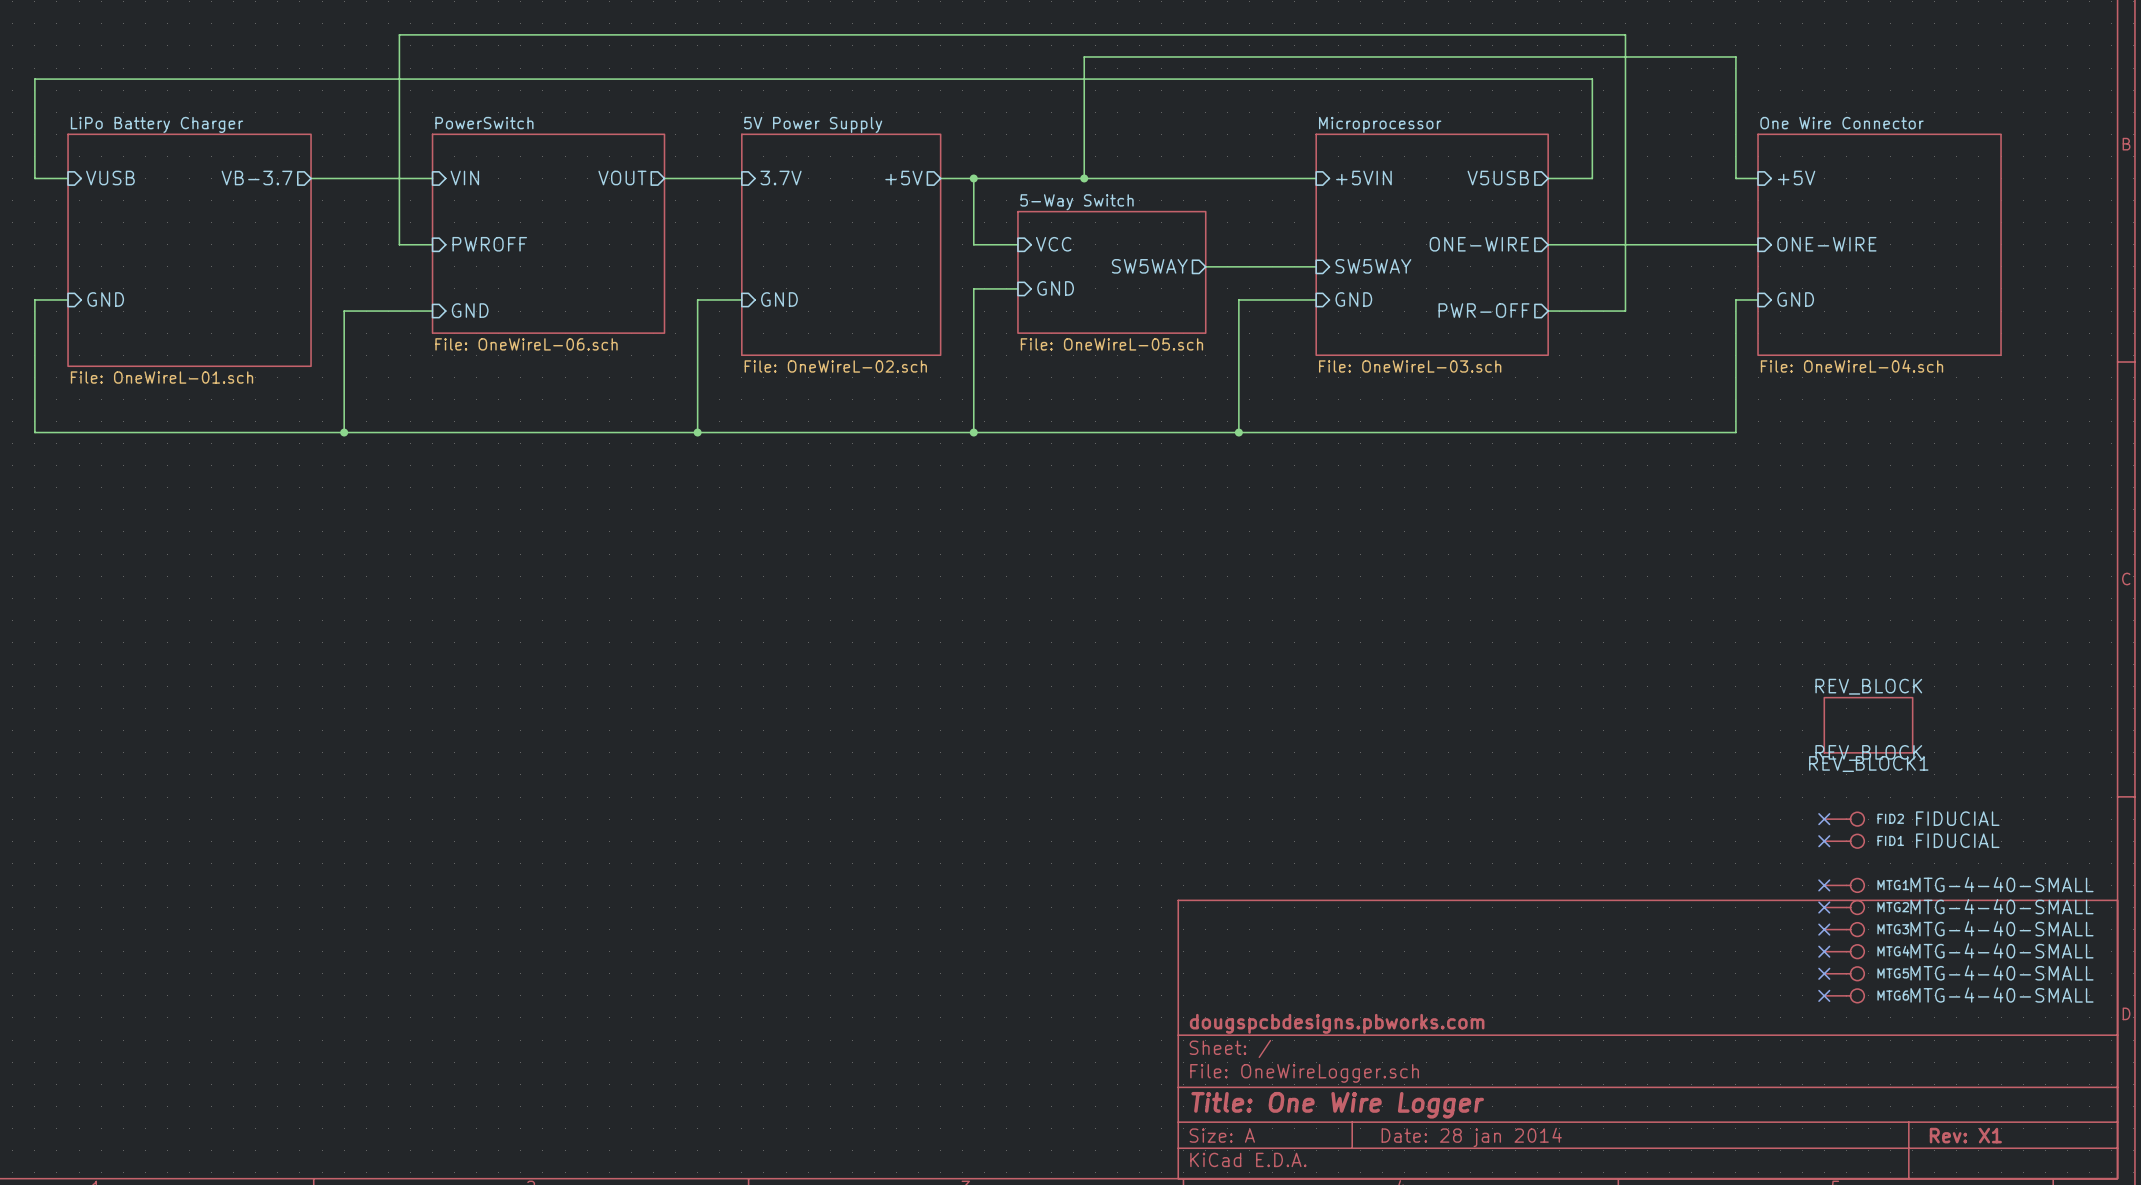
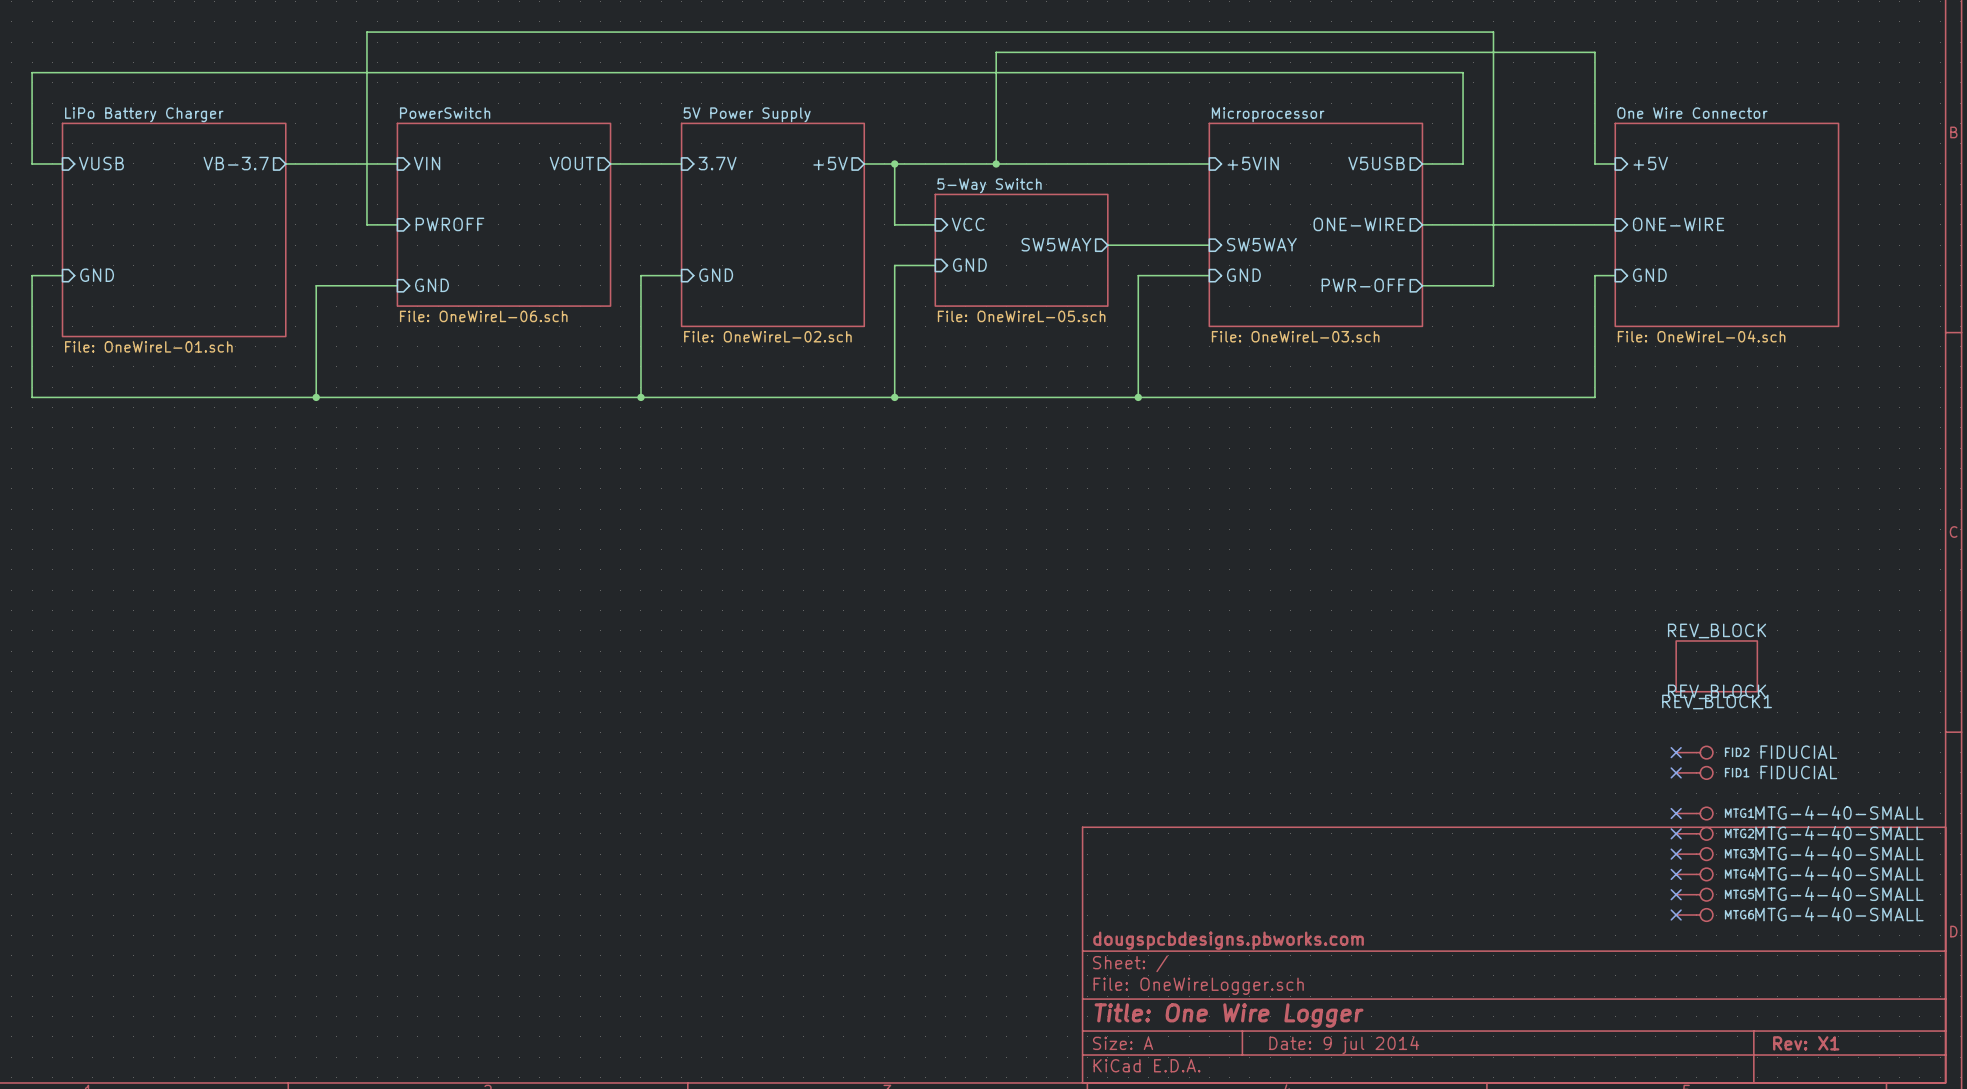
title block: Date: 28 jan 2014 (1471, 1137) -> Date: 9 jul 2014 (1344, 1045)

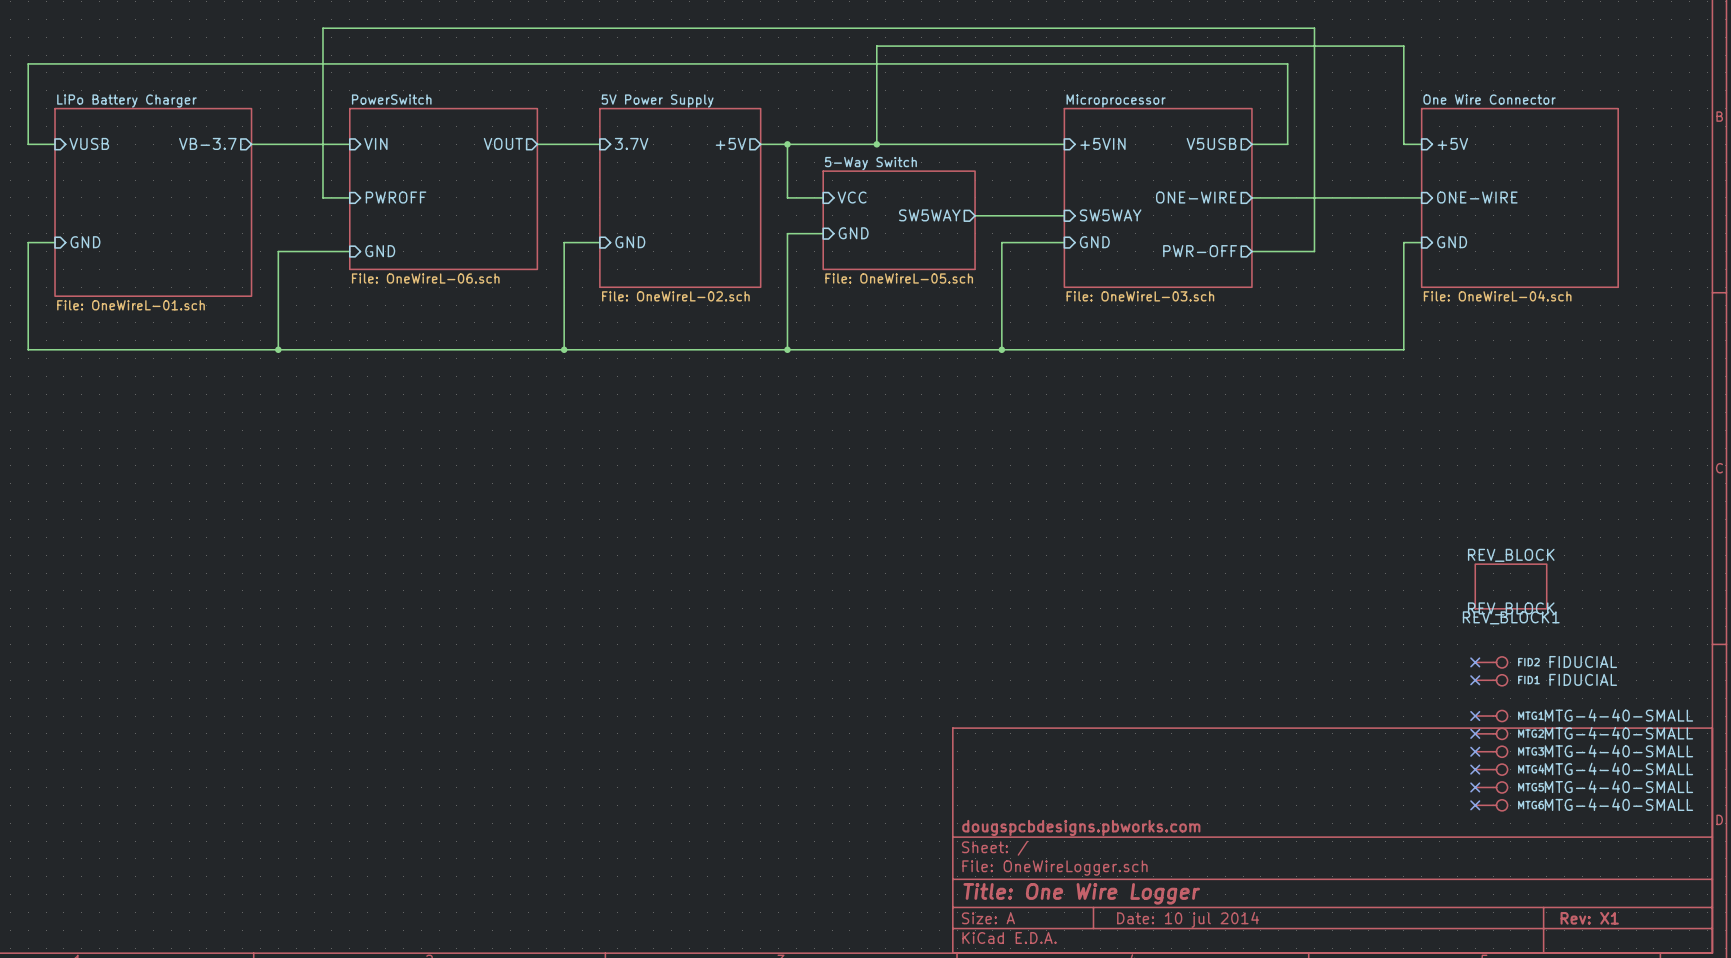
title block: Date: 9 jul 2014 (1344, 1045) -> Date: 10 jul 2014 (1188, 919)

